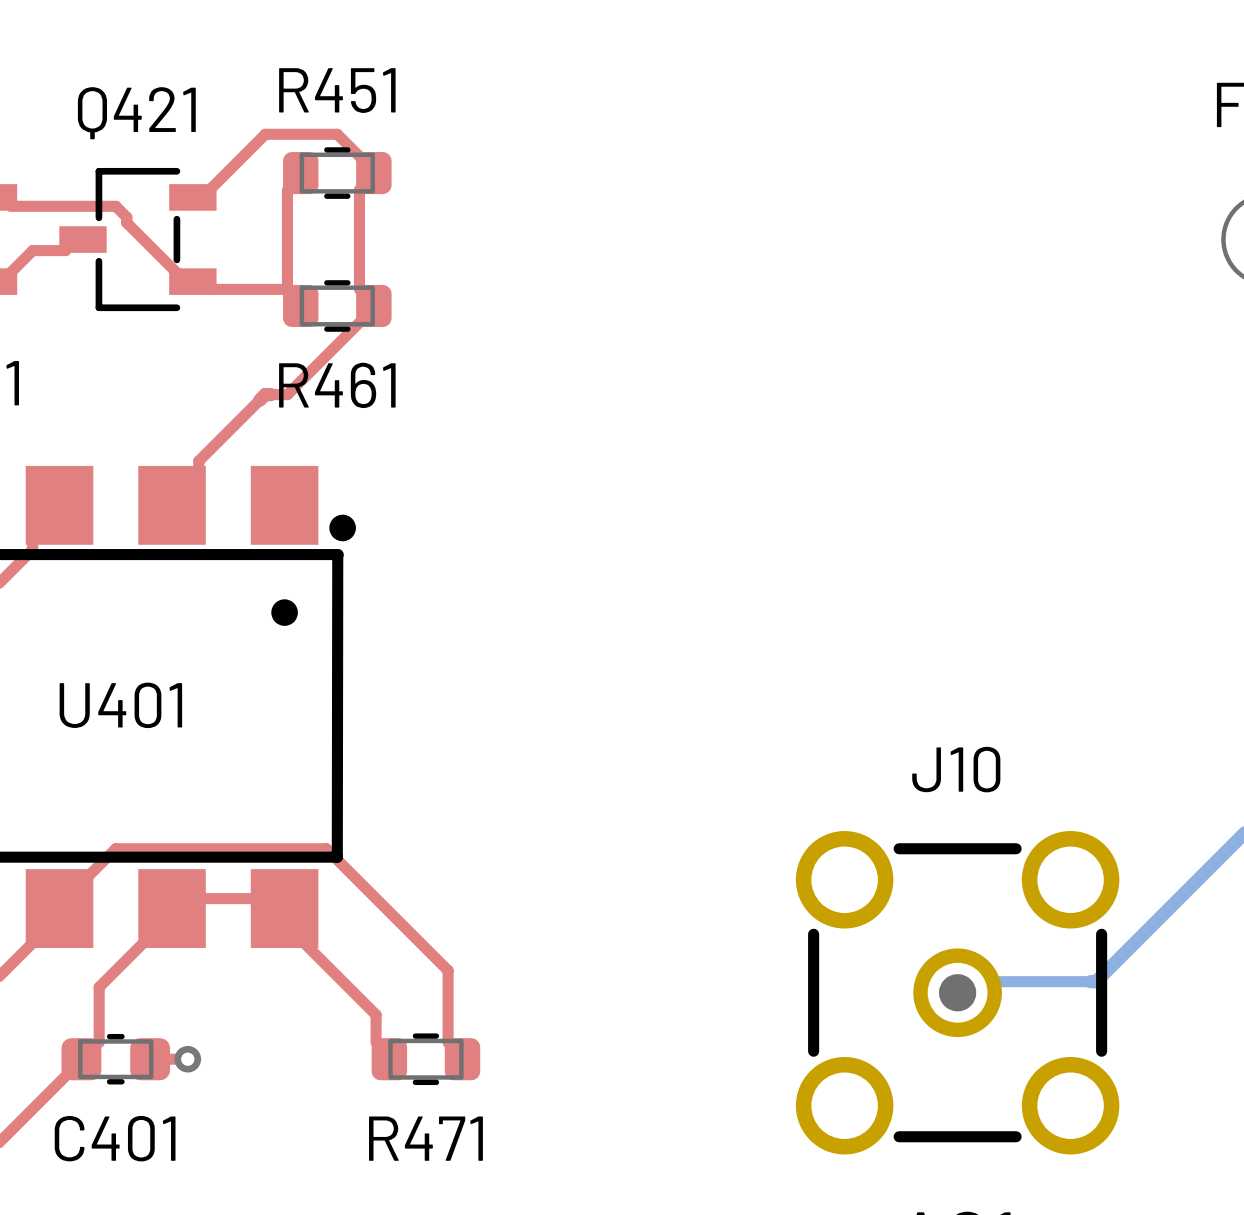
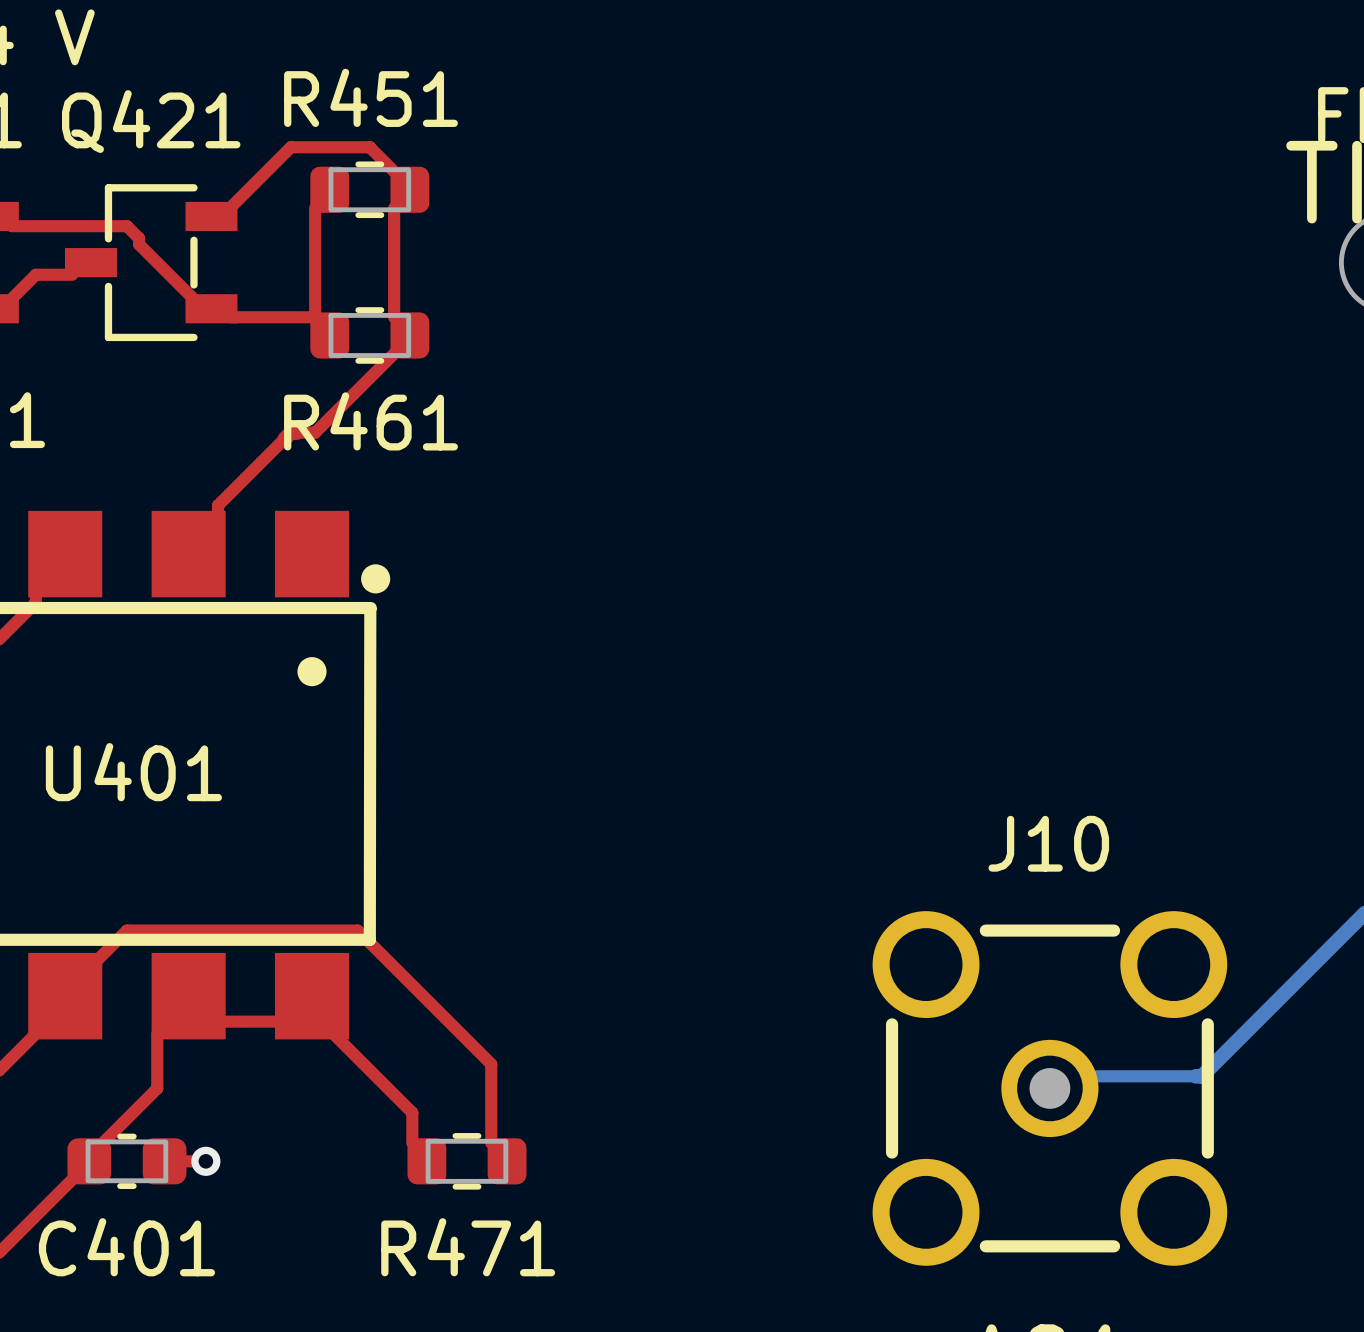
top track: (198, 898) (254, 898) -> (218, 1021) (278, 1021)
top track: (143, 942) (99, 987) (99, 1042) -> (157, 1033) (157, 1088) (102, 1143)

